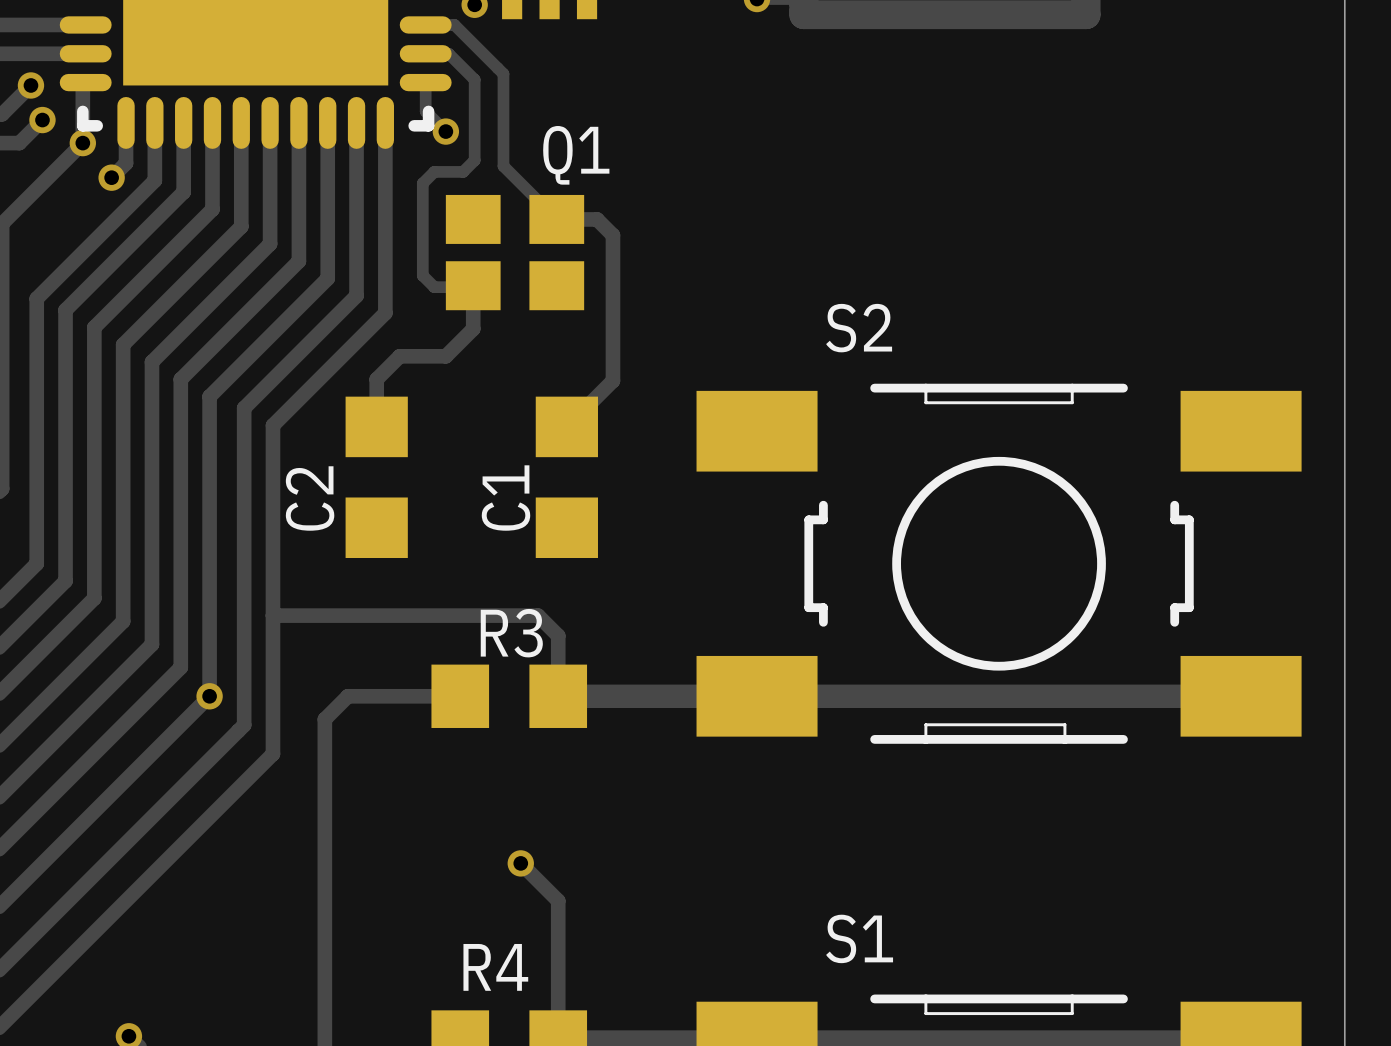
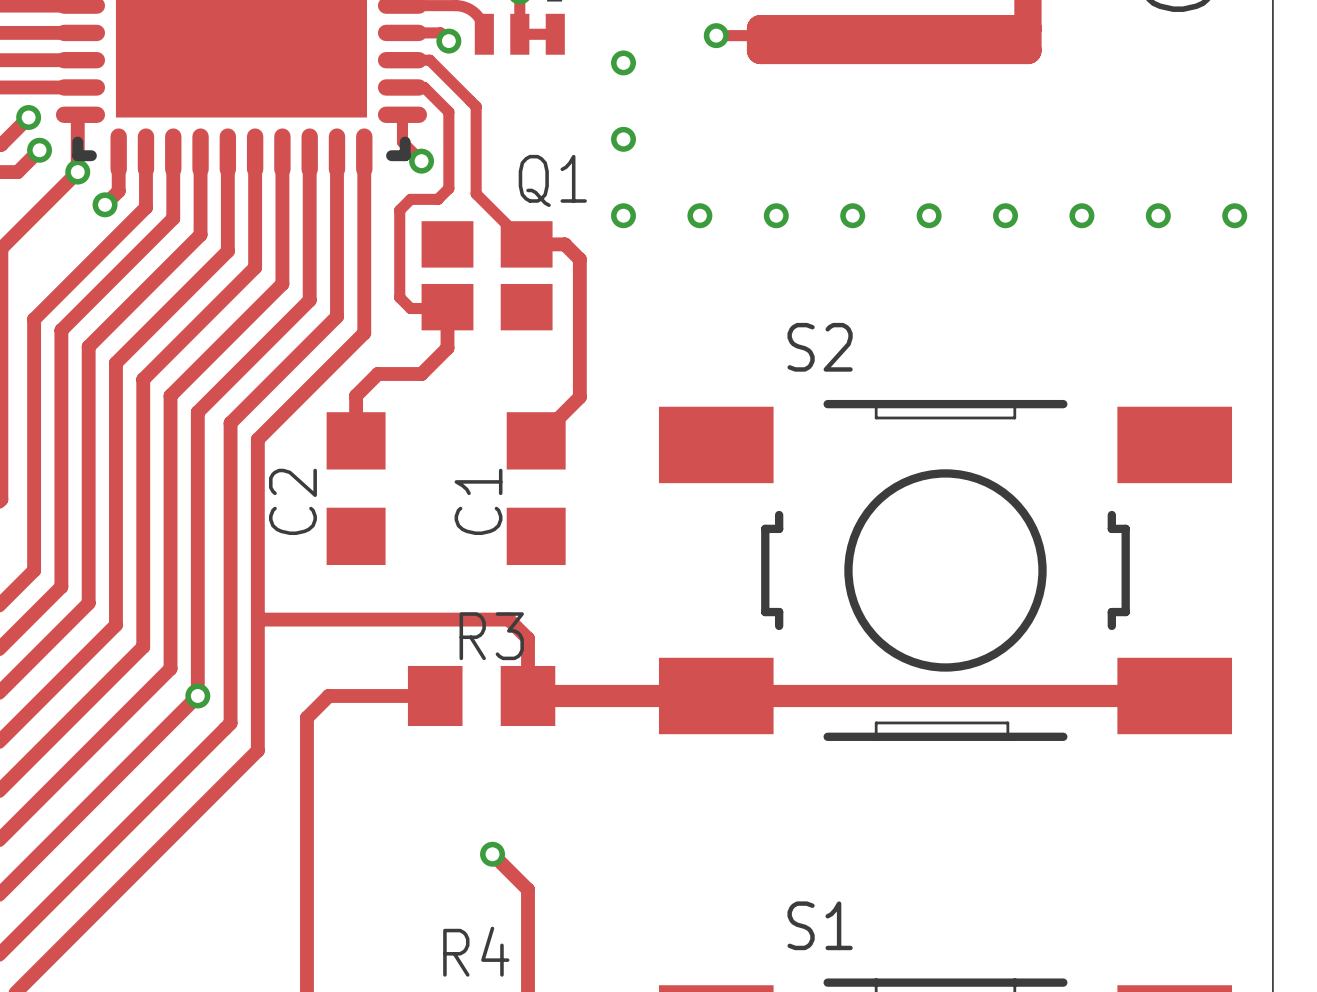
via: none -> (623, 62)
via: none -> (623, 139)
via: none -> (623, 215)
via: none -> (699, 215)
via: none -> (776, 215)
via: none -> (852, 215)
via: none -> (929, 215)
via: none -> (1005, 215)
via: none -> (1081, 215)
via: none -> (1158, 215)
via: none -> (1234, 215)

